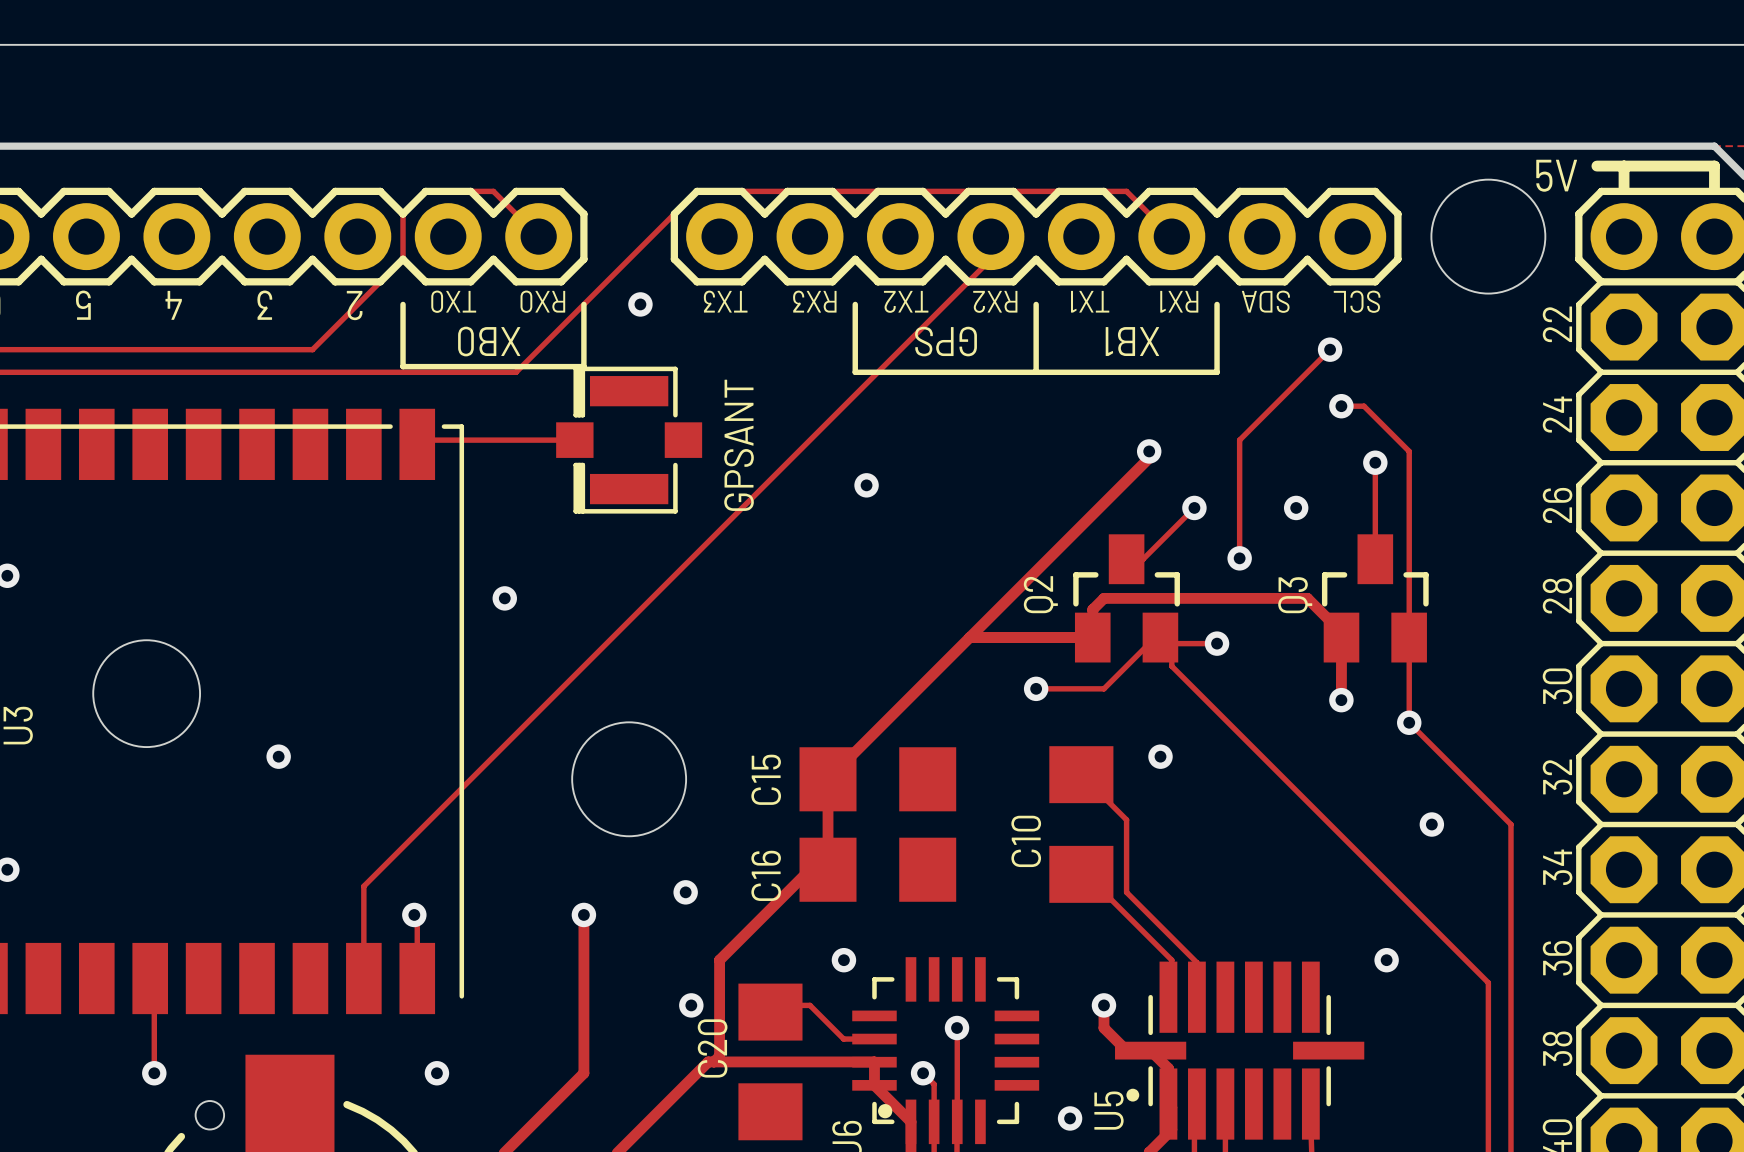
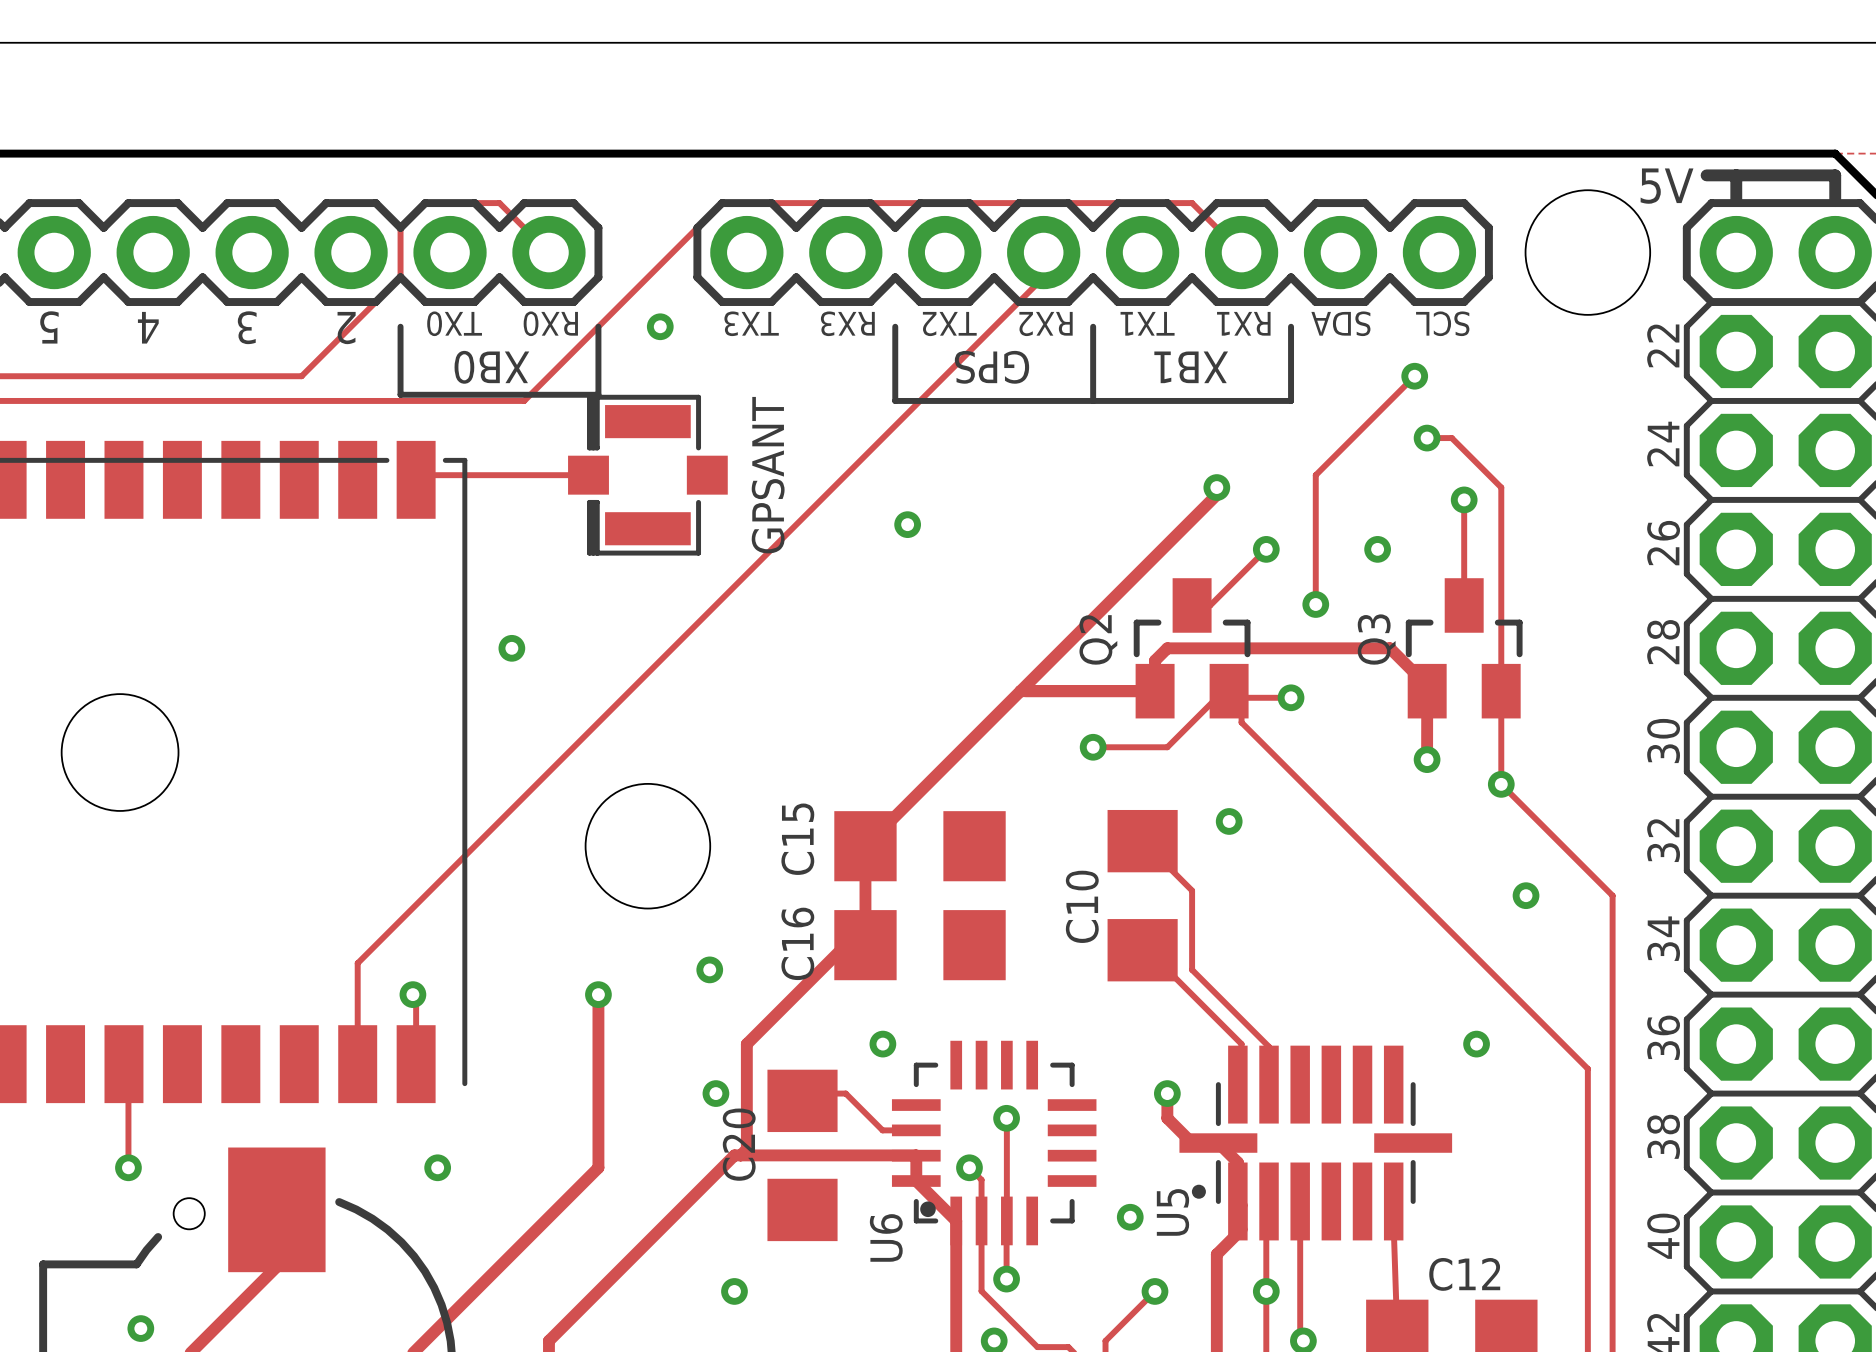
via: (278, 756) -> none

